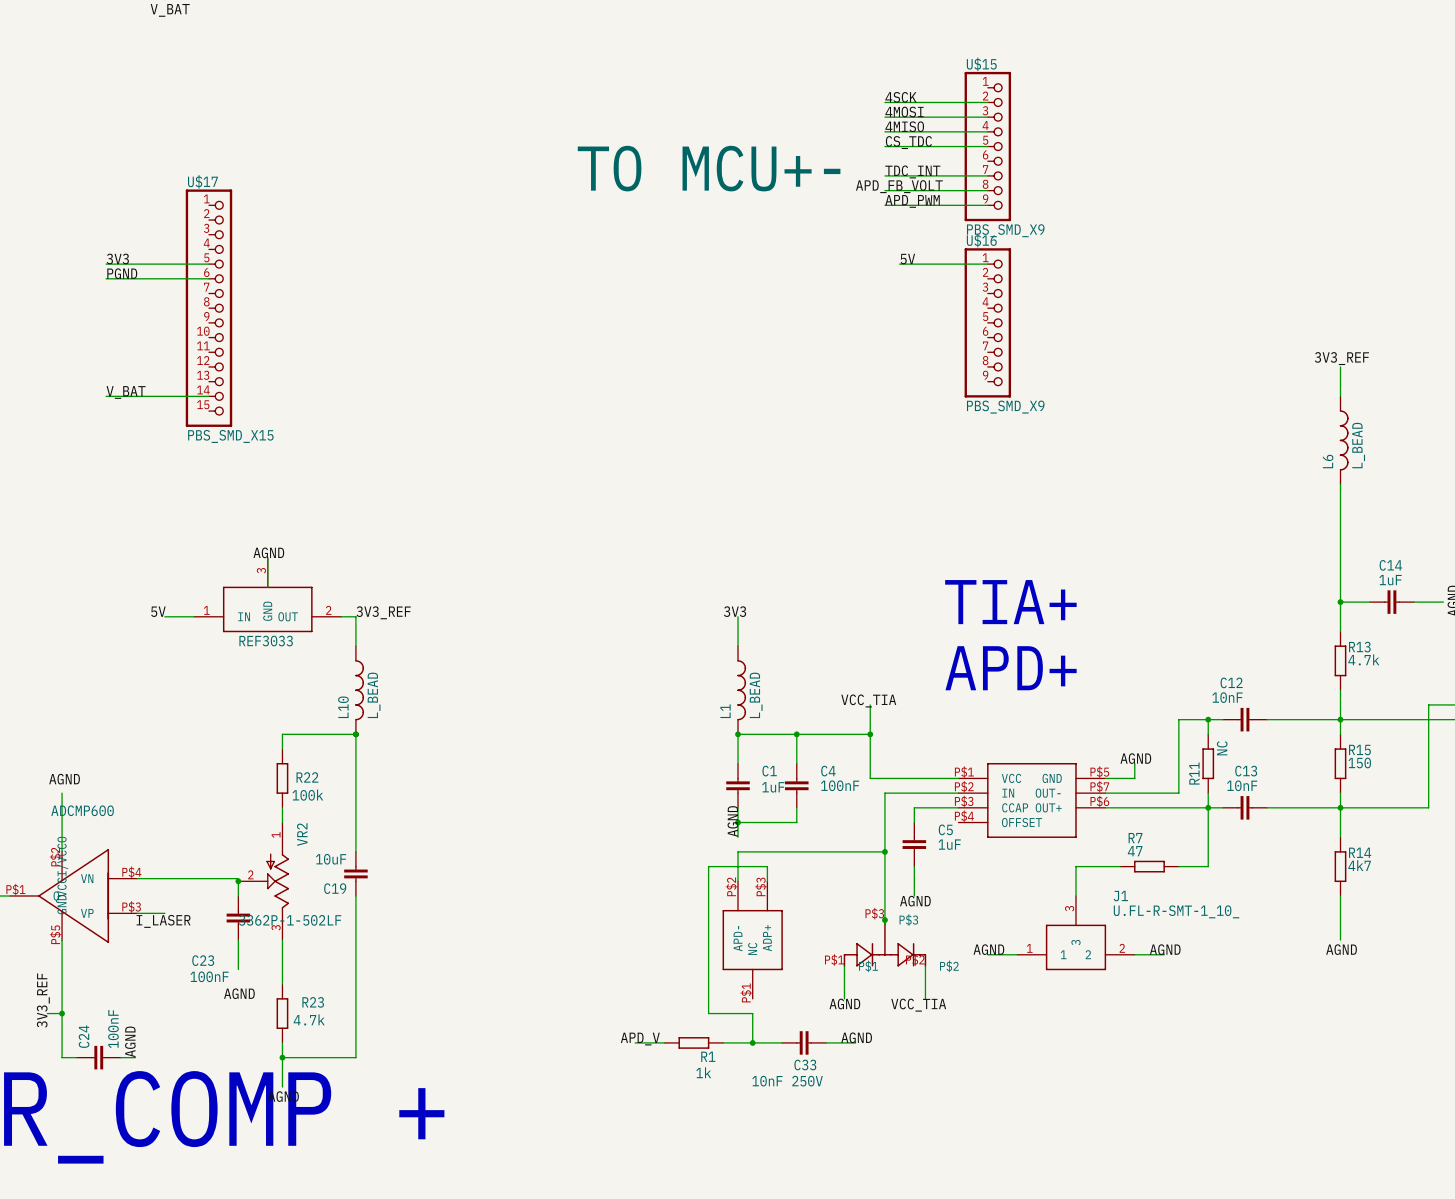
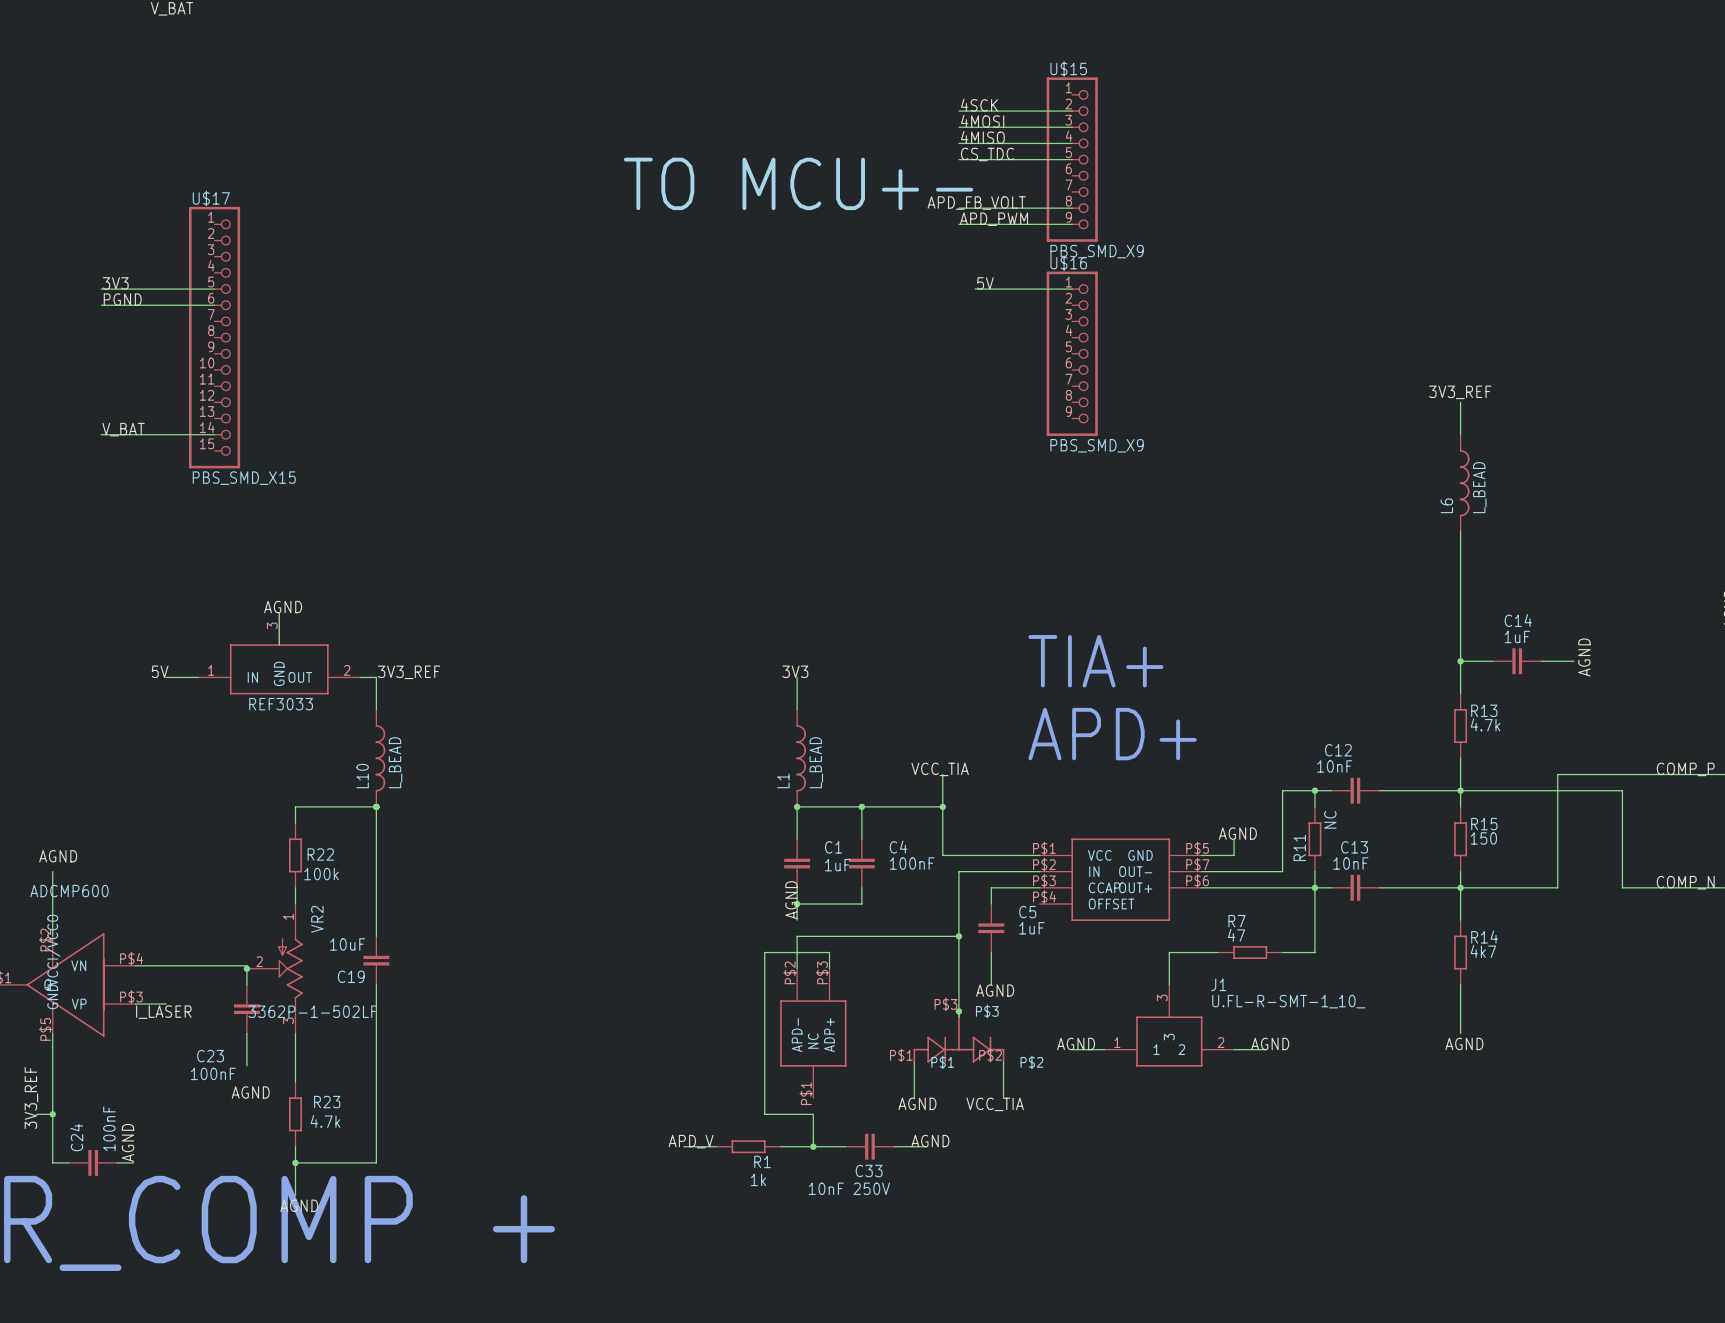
label: TDC_INT (912, 171) -> none
wire: (884, 175) (987, 175) -> none

